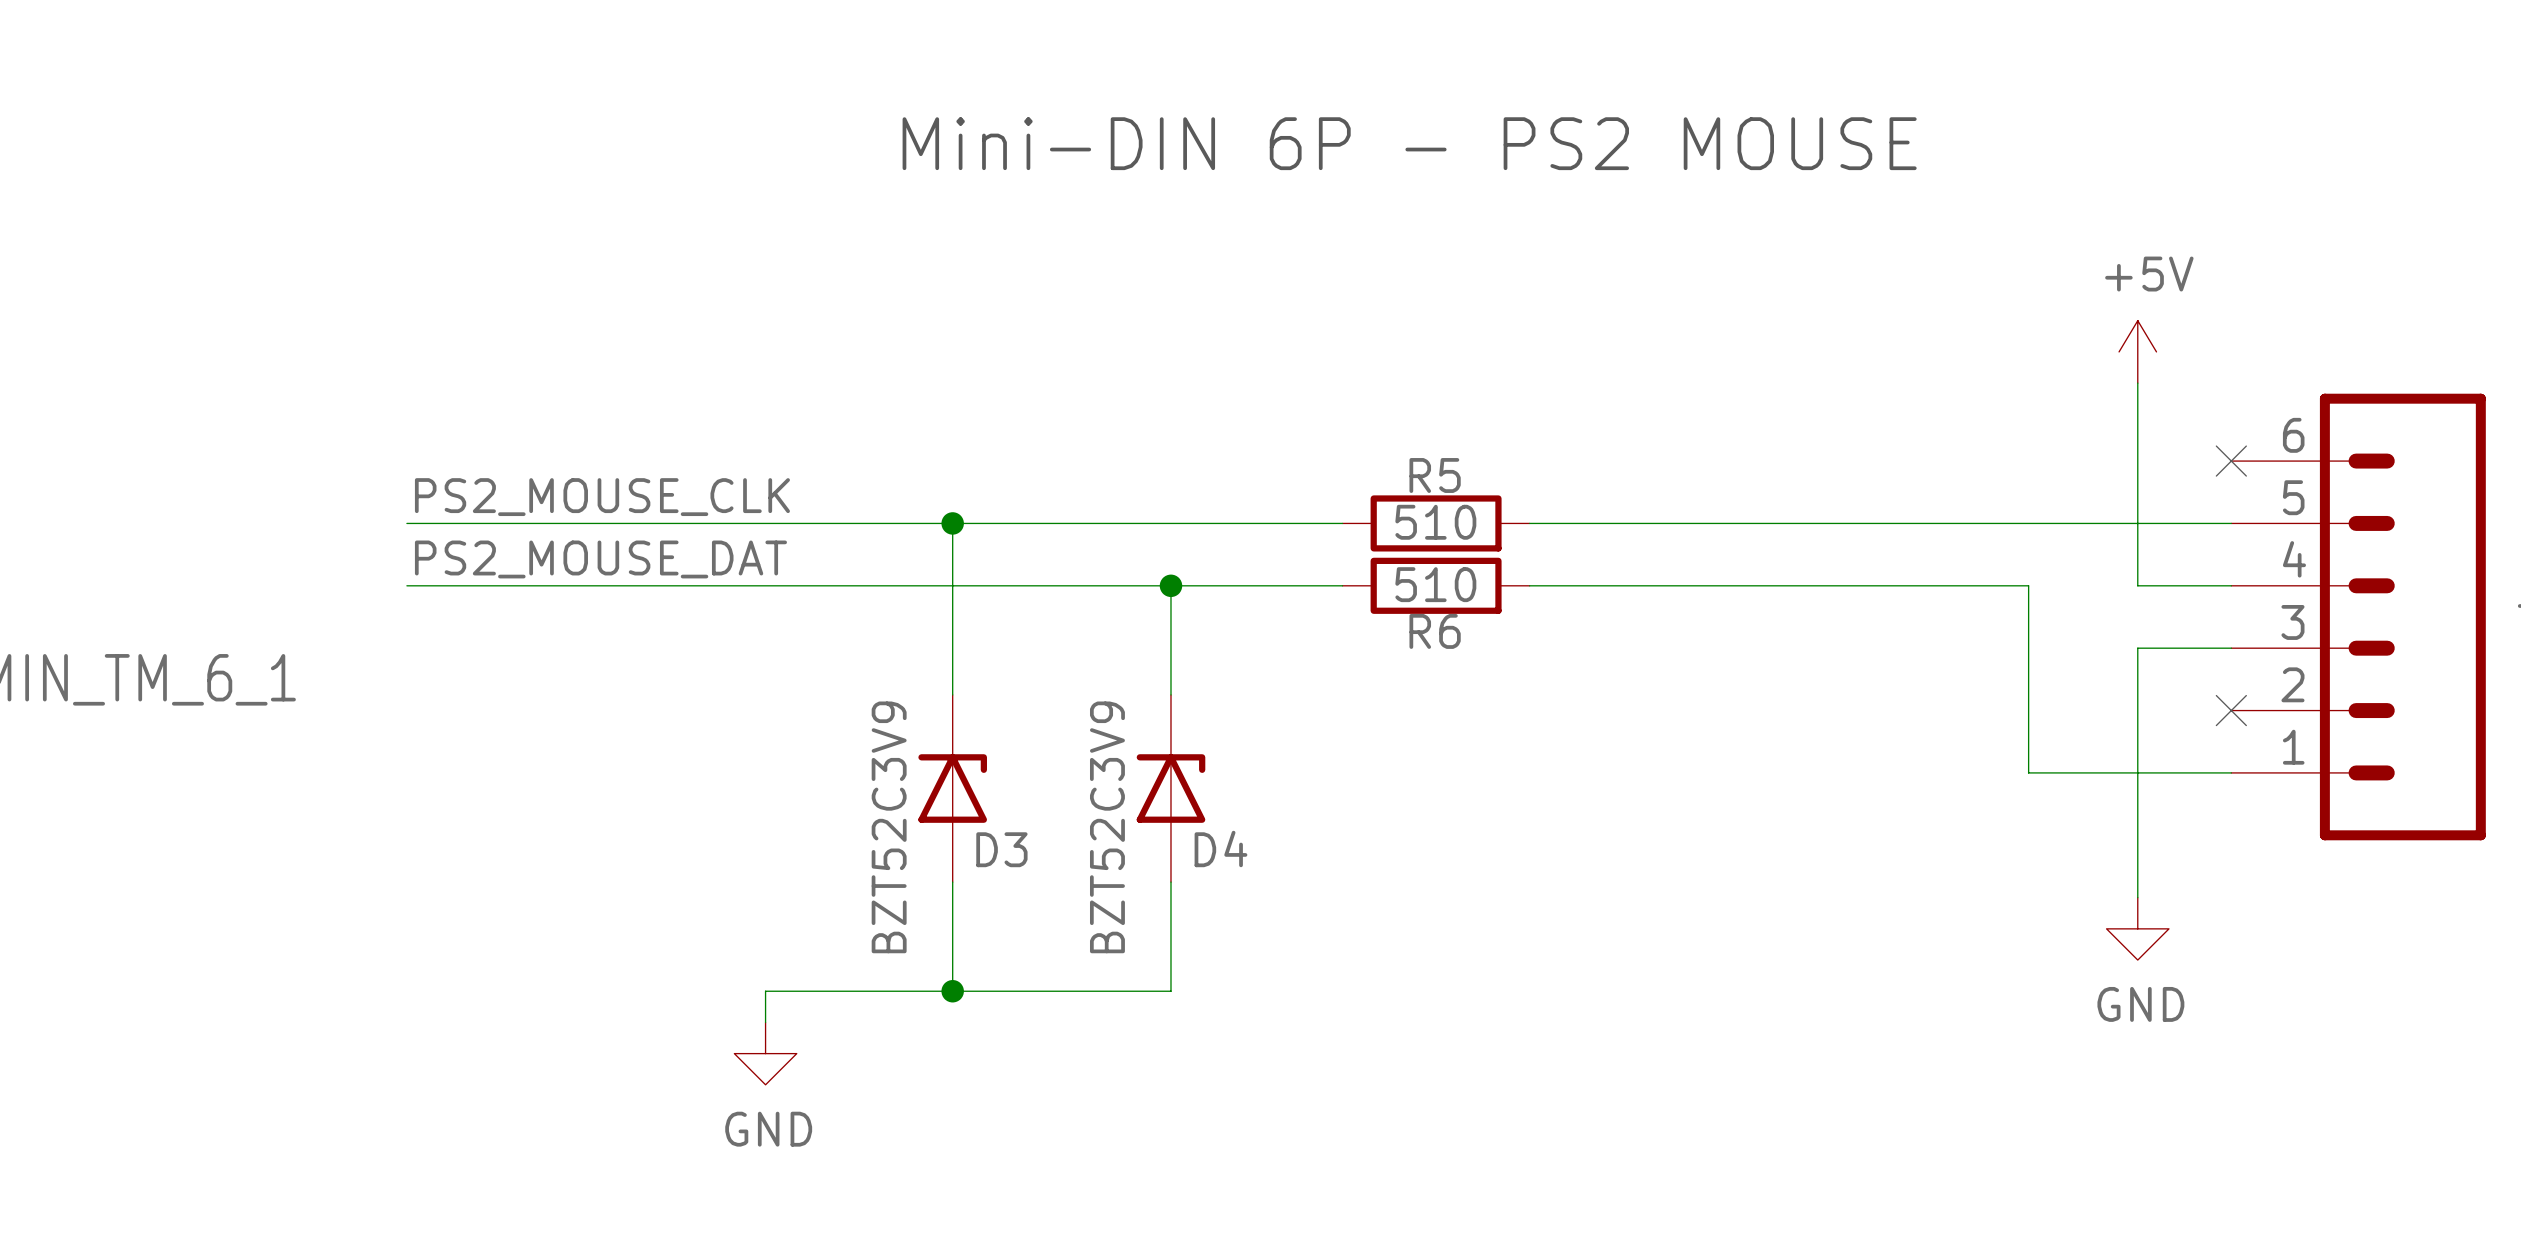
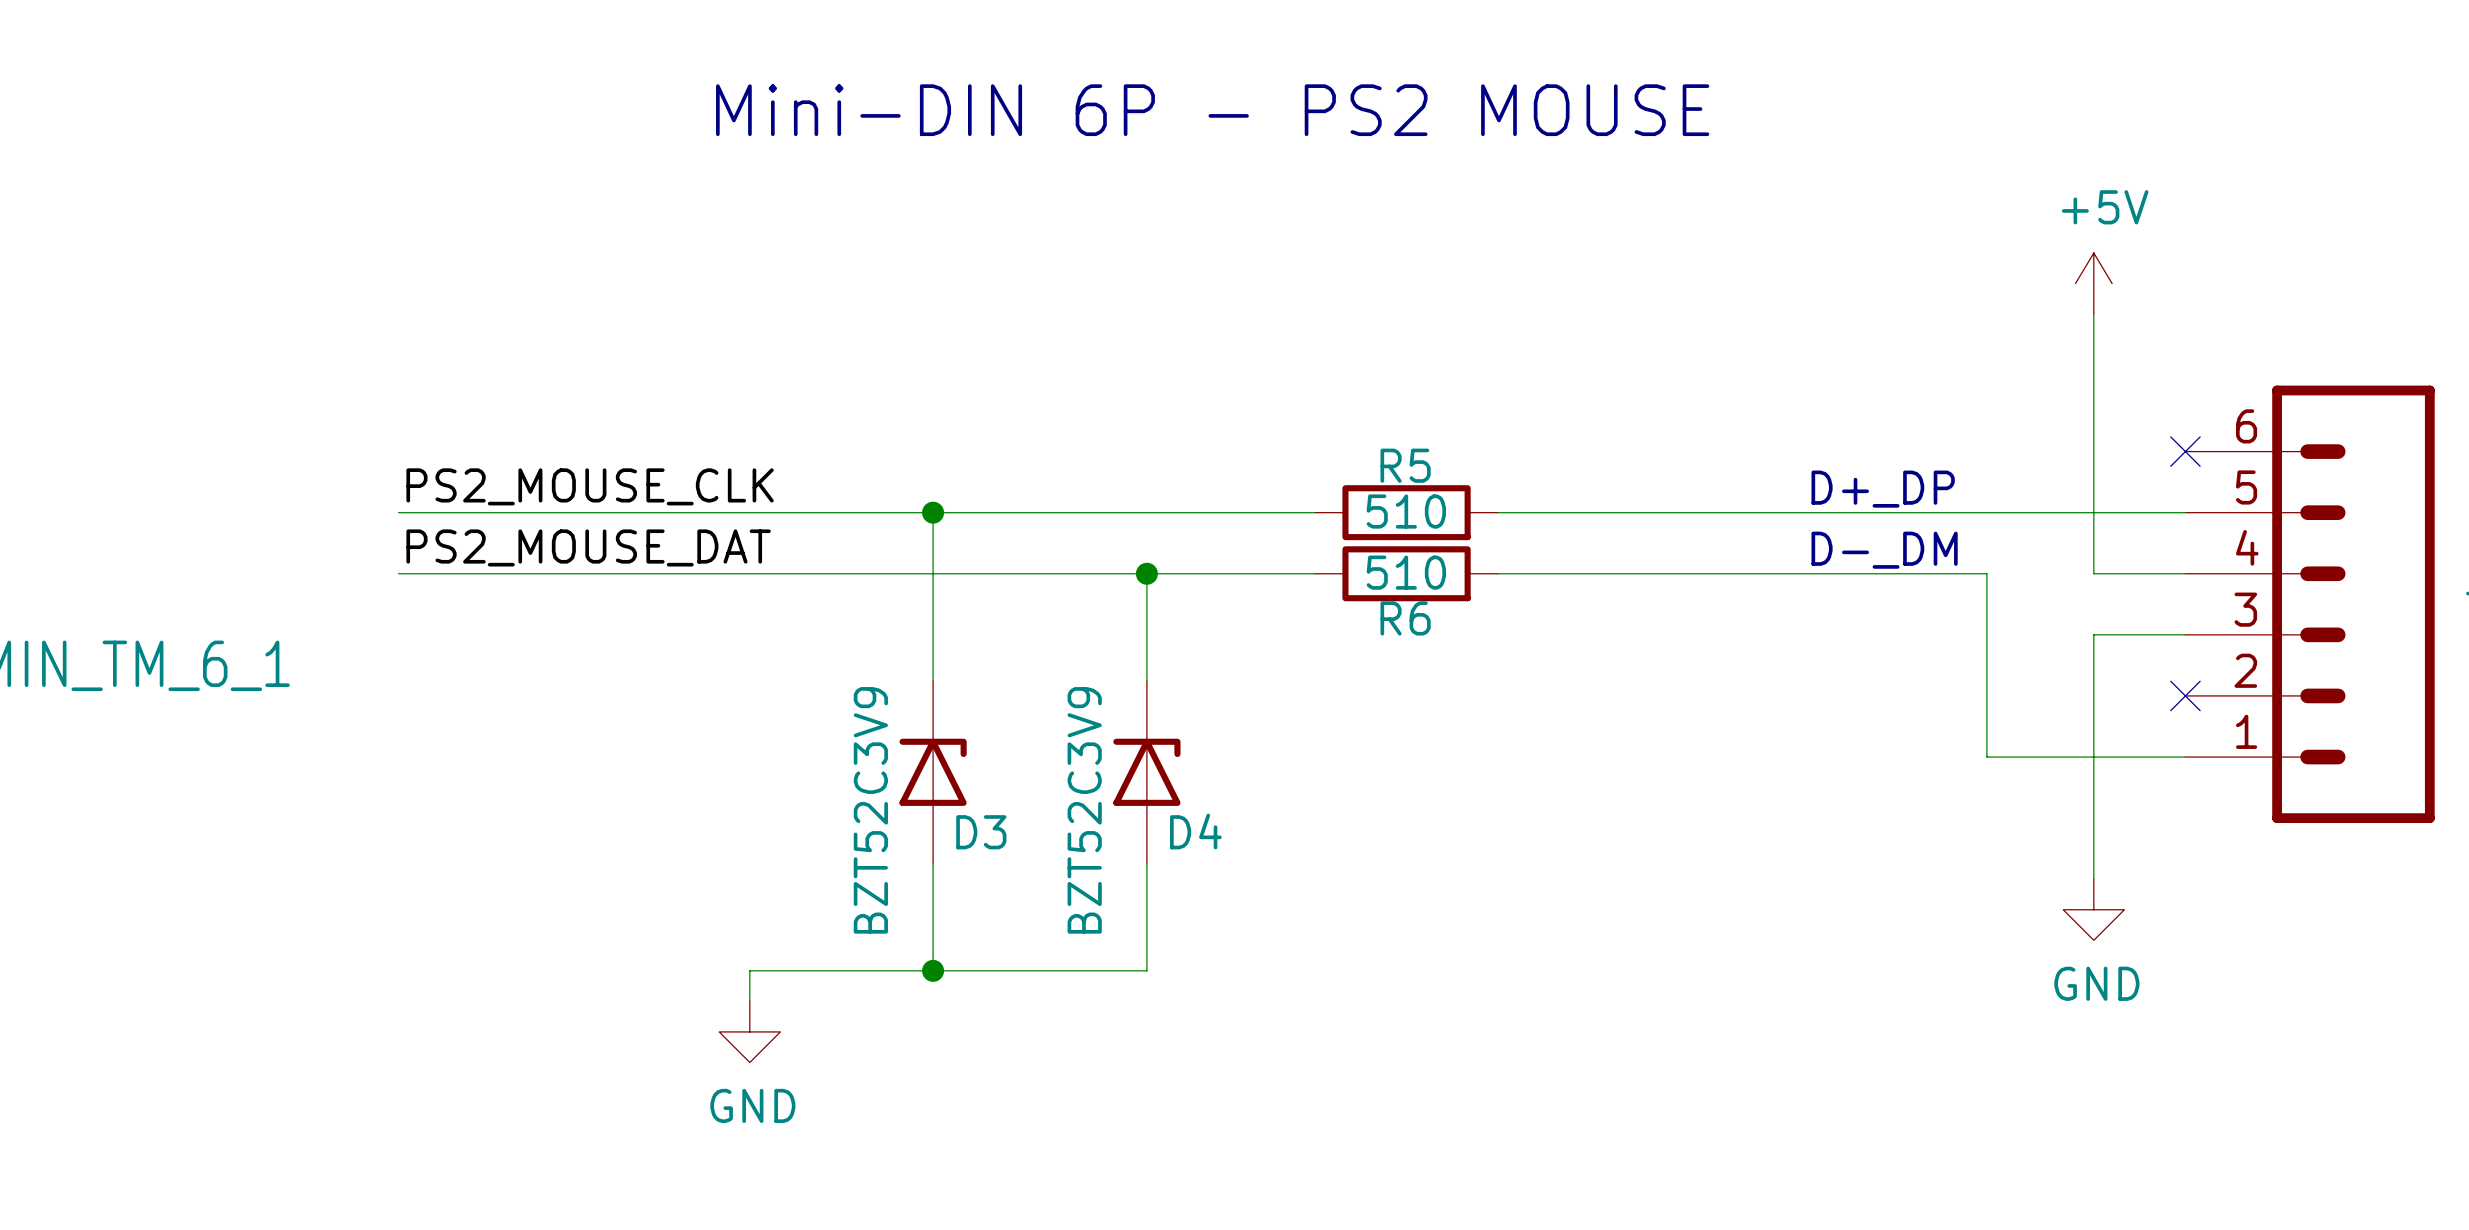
text position: Mini-DIN 6P - PS2 MOUSE (1409, 143) -> Mini-DIN 6P - PS2 MOUSE (1212, 110)
power symbol position: +5V (2137, 351) -> +5V (2093, 283)
text: none -> D+_DP (1883, 489)
text: none -> D-_DM (1884, 550)

